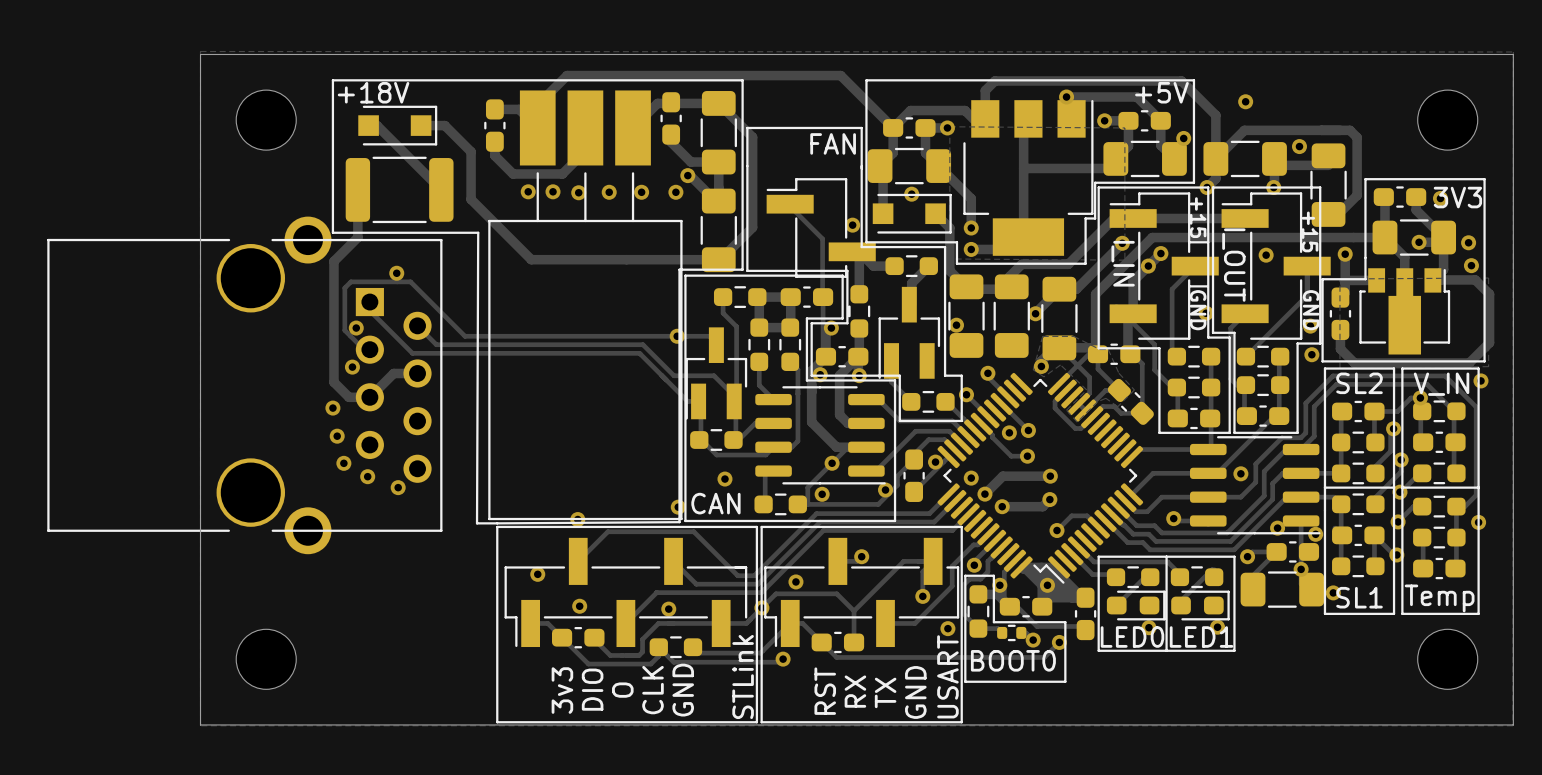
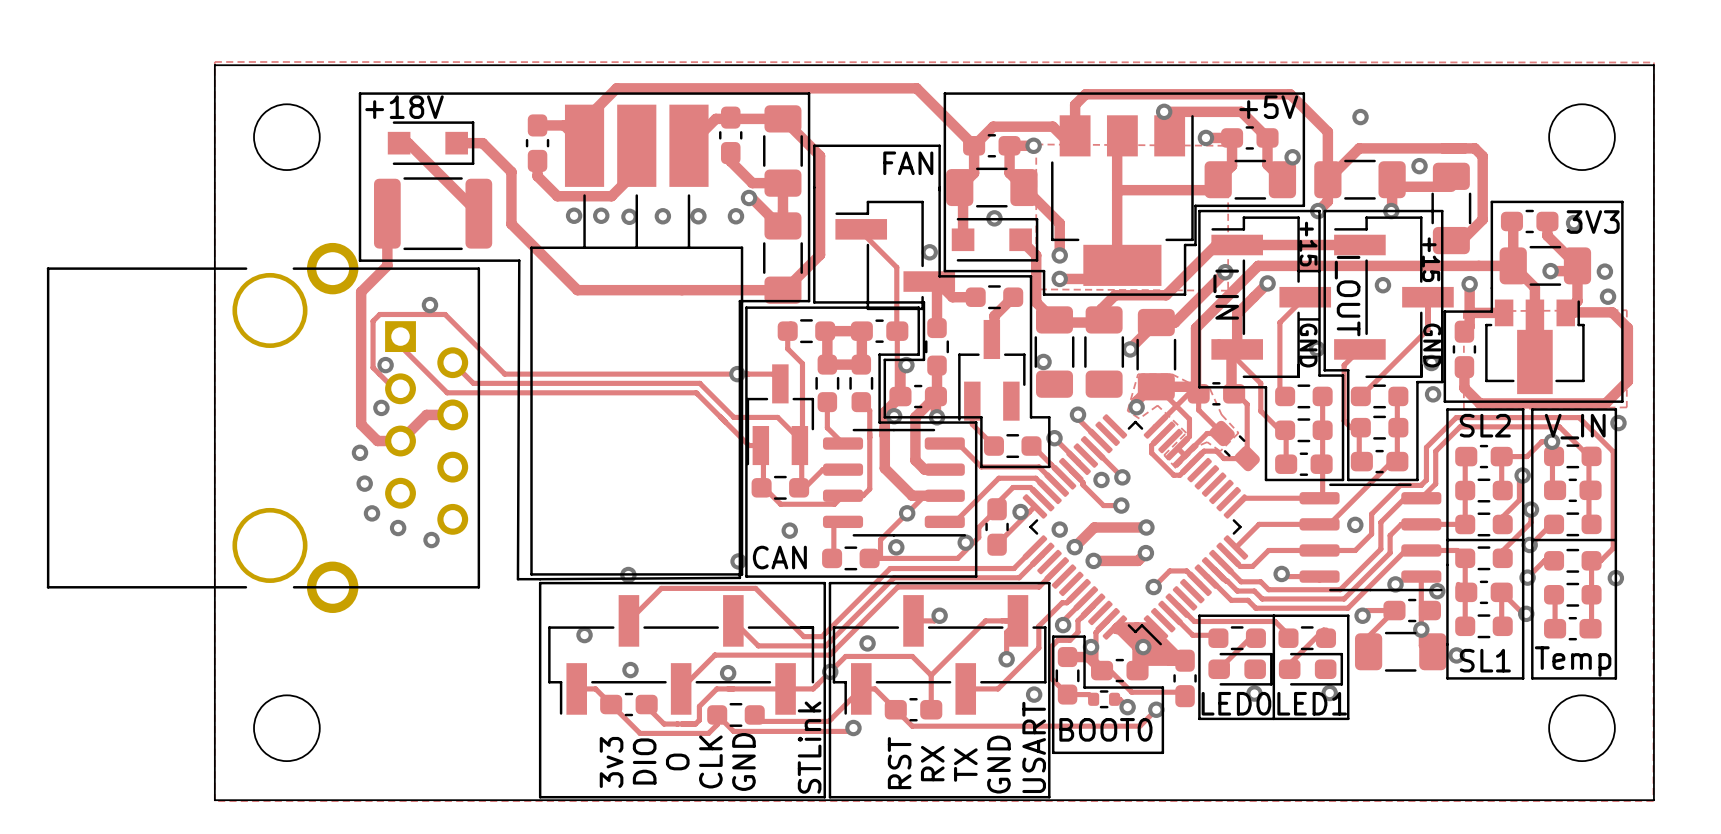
via: (1148, 266) -> none

